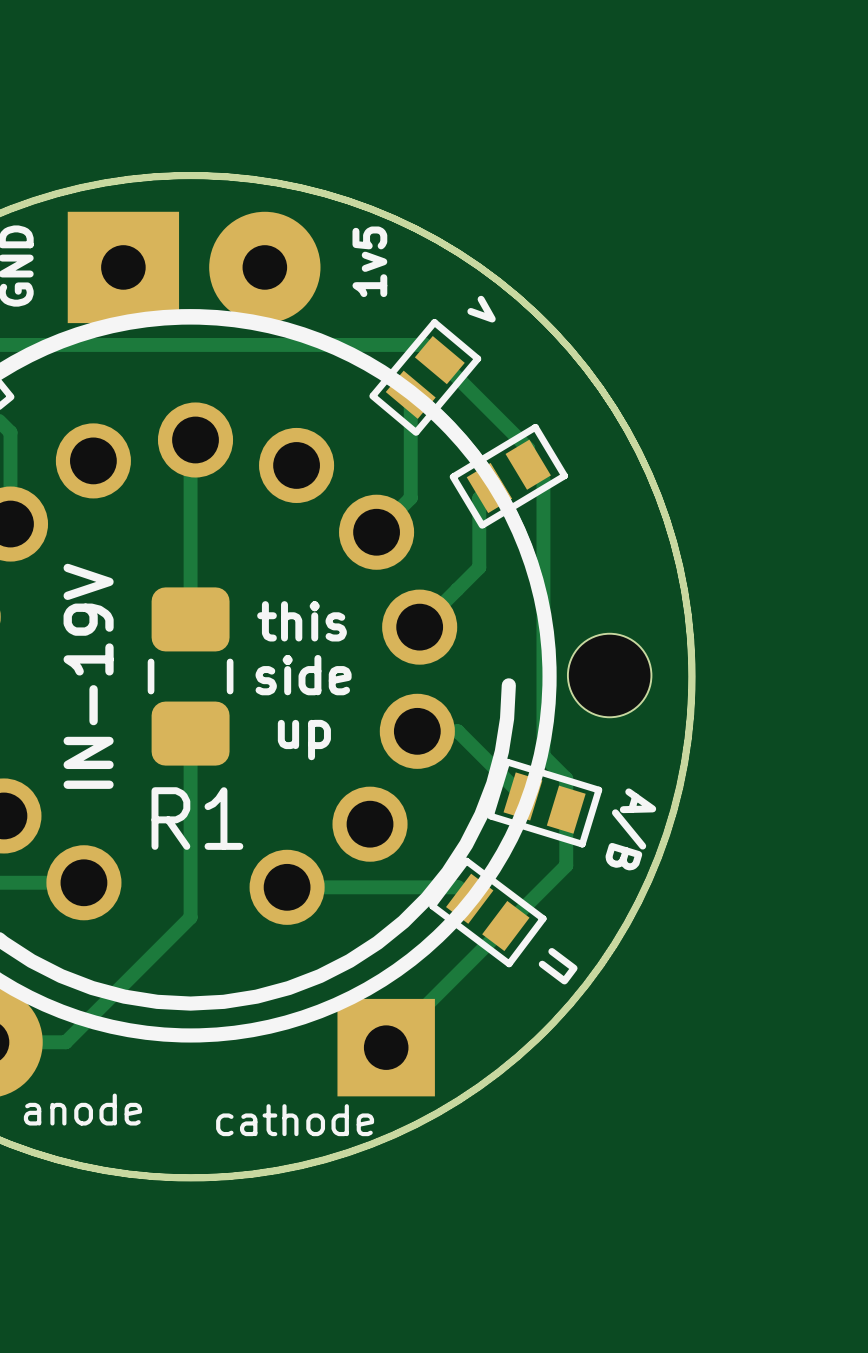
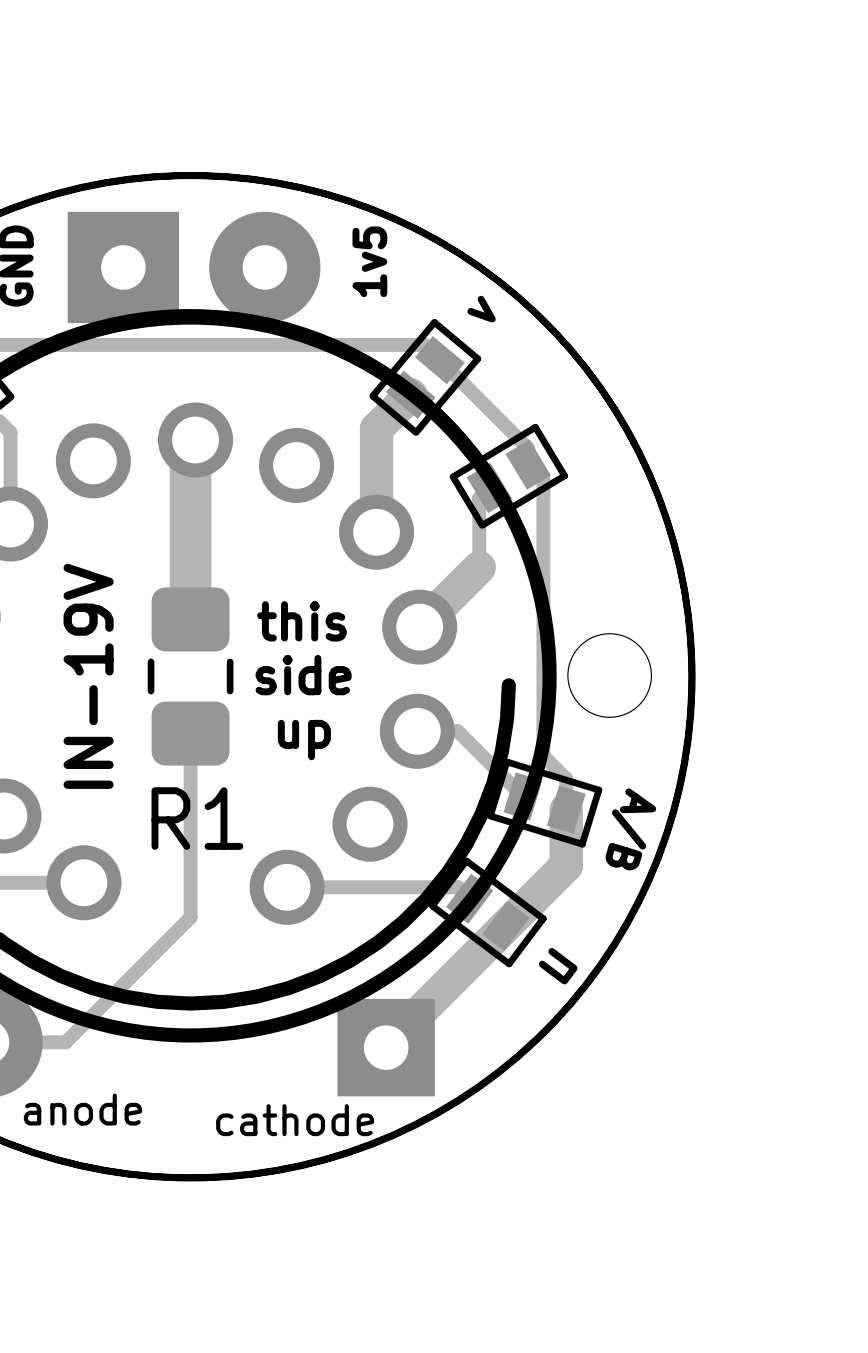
track: (410, 394) (410, 498) (376, 532) -> (410, 394) (376, 428) (376, 532)
track width: thin (195, 439) (190, 444) (190, 619) -> thick (195, 439) (190, 444) (190, 619)
track width: thin (479, 567) (419, 627) -> thick (479, 567) (419, 627)
track width: thin (566, 809) (566, 865) (386, 1047) -> thick (566, 809) (566, 865) (386, 1047)

